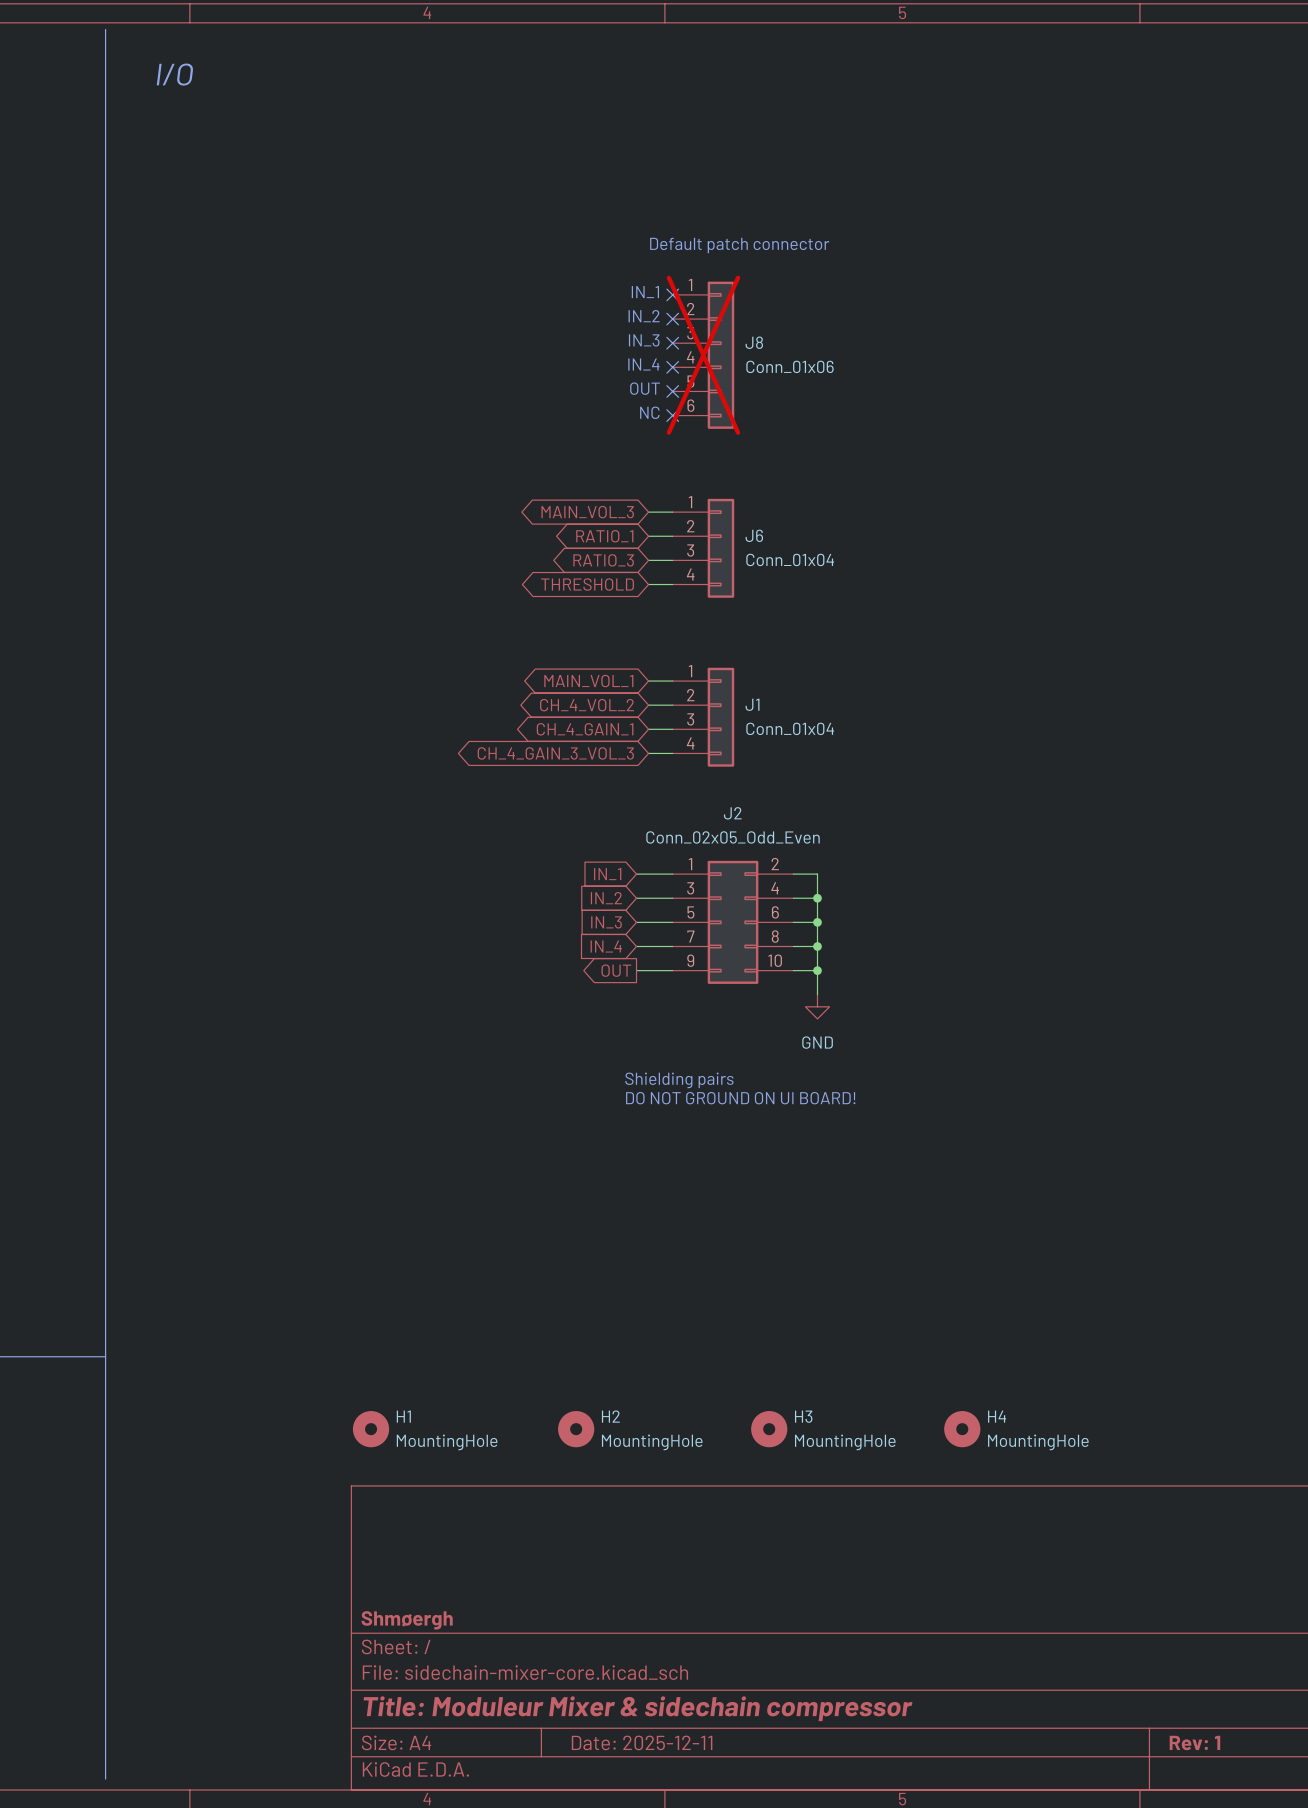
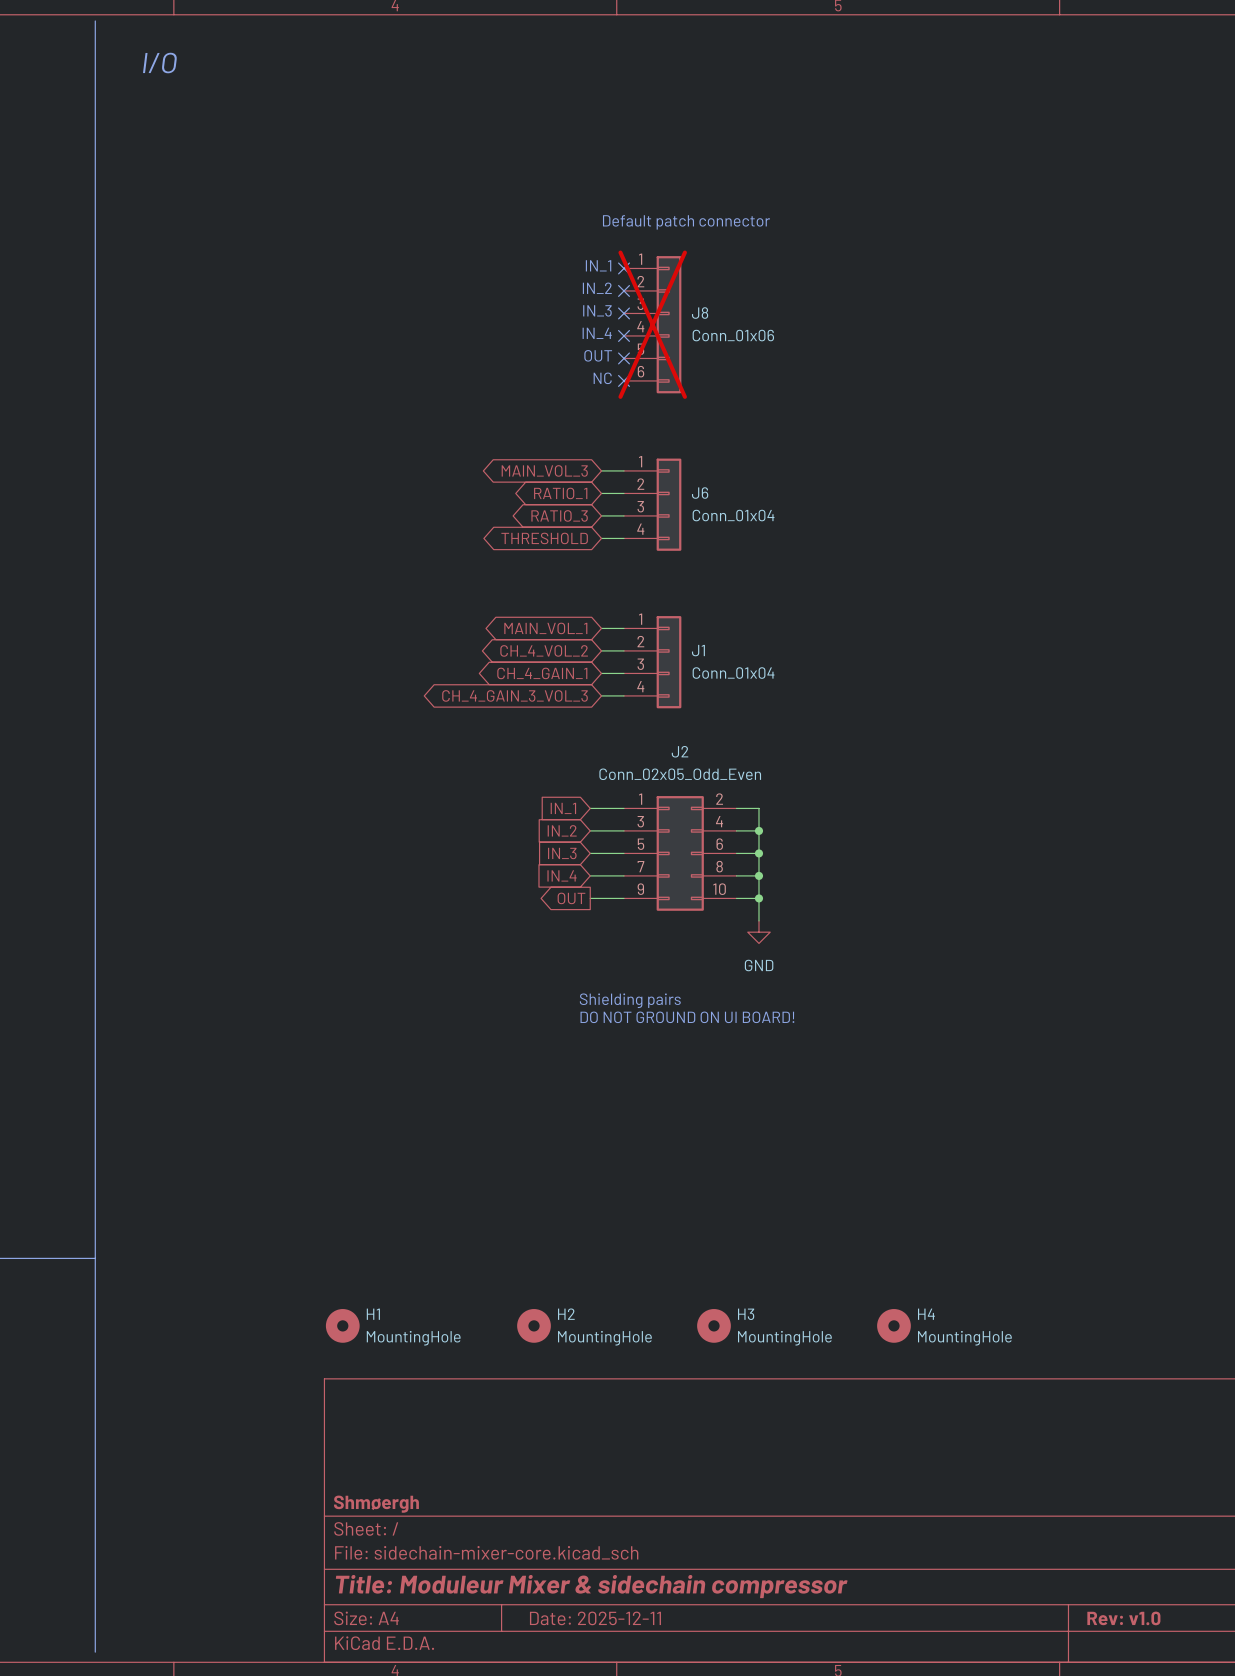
title block: Rev: 1 (1194, 1742) -> Rev: v1.0 (1123, 1618)

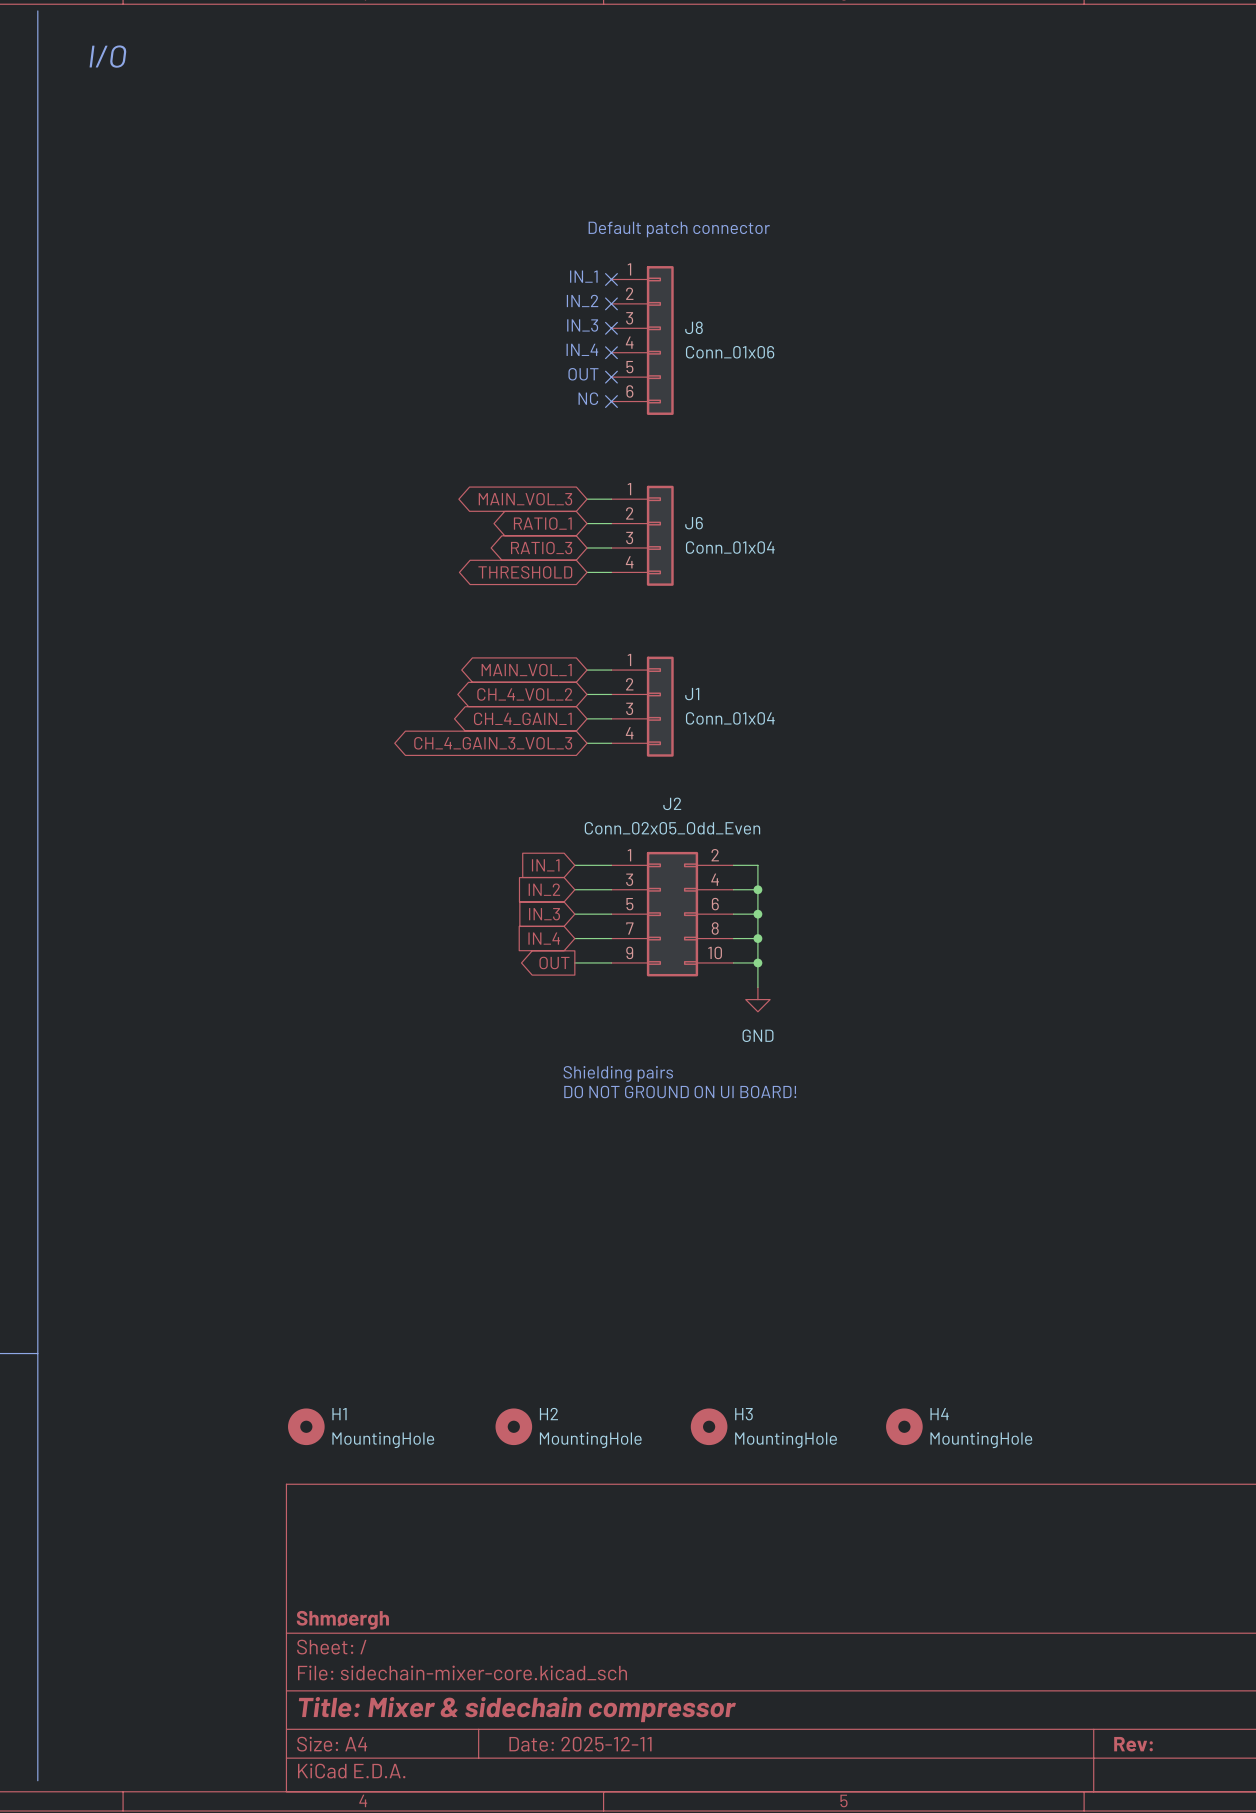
J8 do-not-place cross: (652, 324) -> none
title block: Title: Moduleur Mixer & sidechain compressor (591, 1586) -> Title: Mixer & sidechain compressor (517, 1709)
title block: Rev: v1.0 (1123, 1618) -> Rev: (1133, 1744)

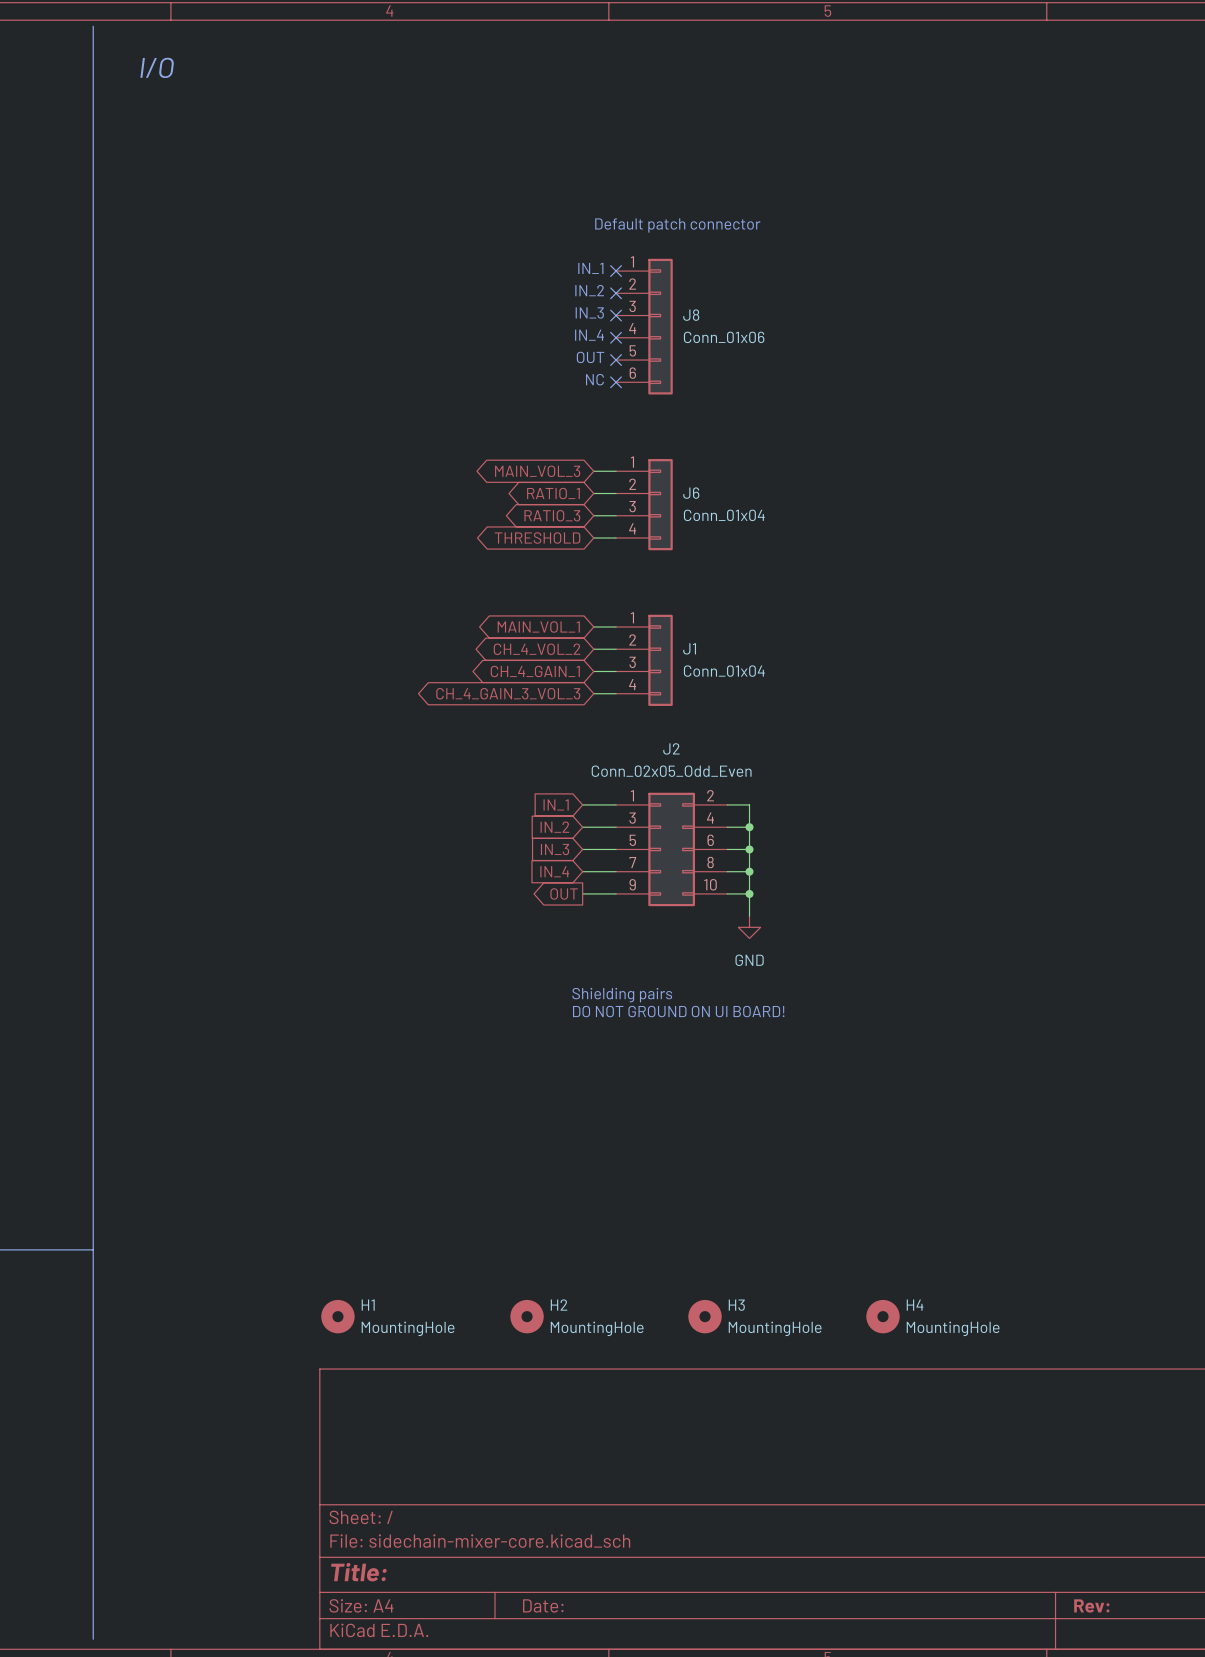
title block: Shmøergh (342, 1620) -> none
title block: Title: Mixer & sidechain compressor (517, 1709) -> Title: (358, 1572)
title block: Date: 2025-12-11 (580, 1744) -> Date: (543, 1605)

